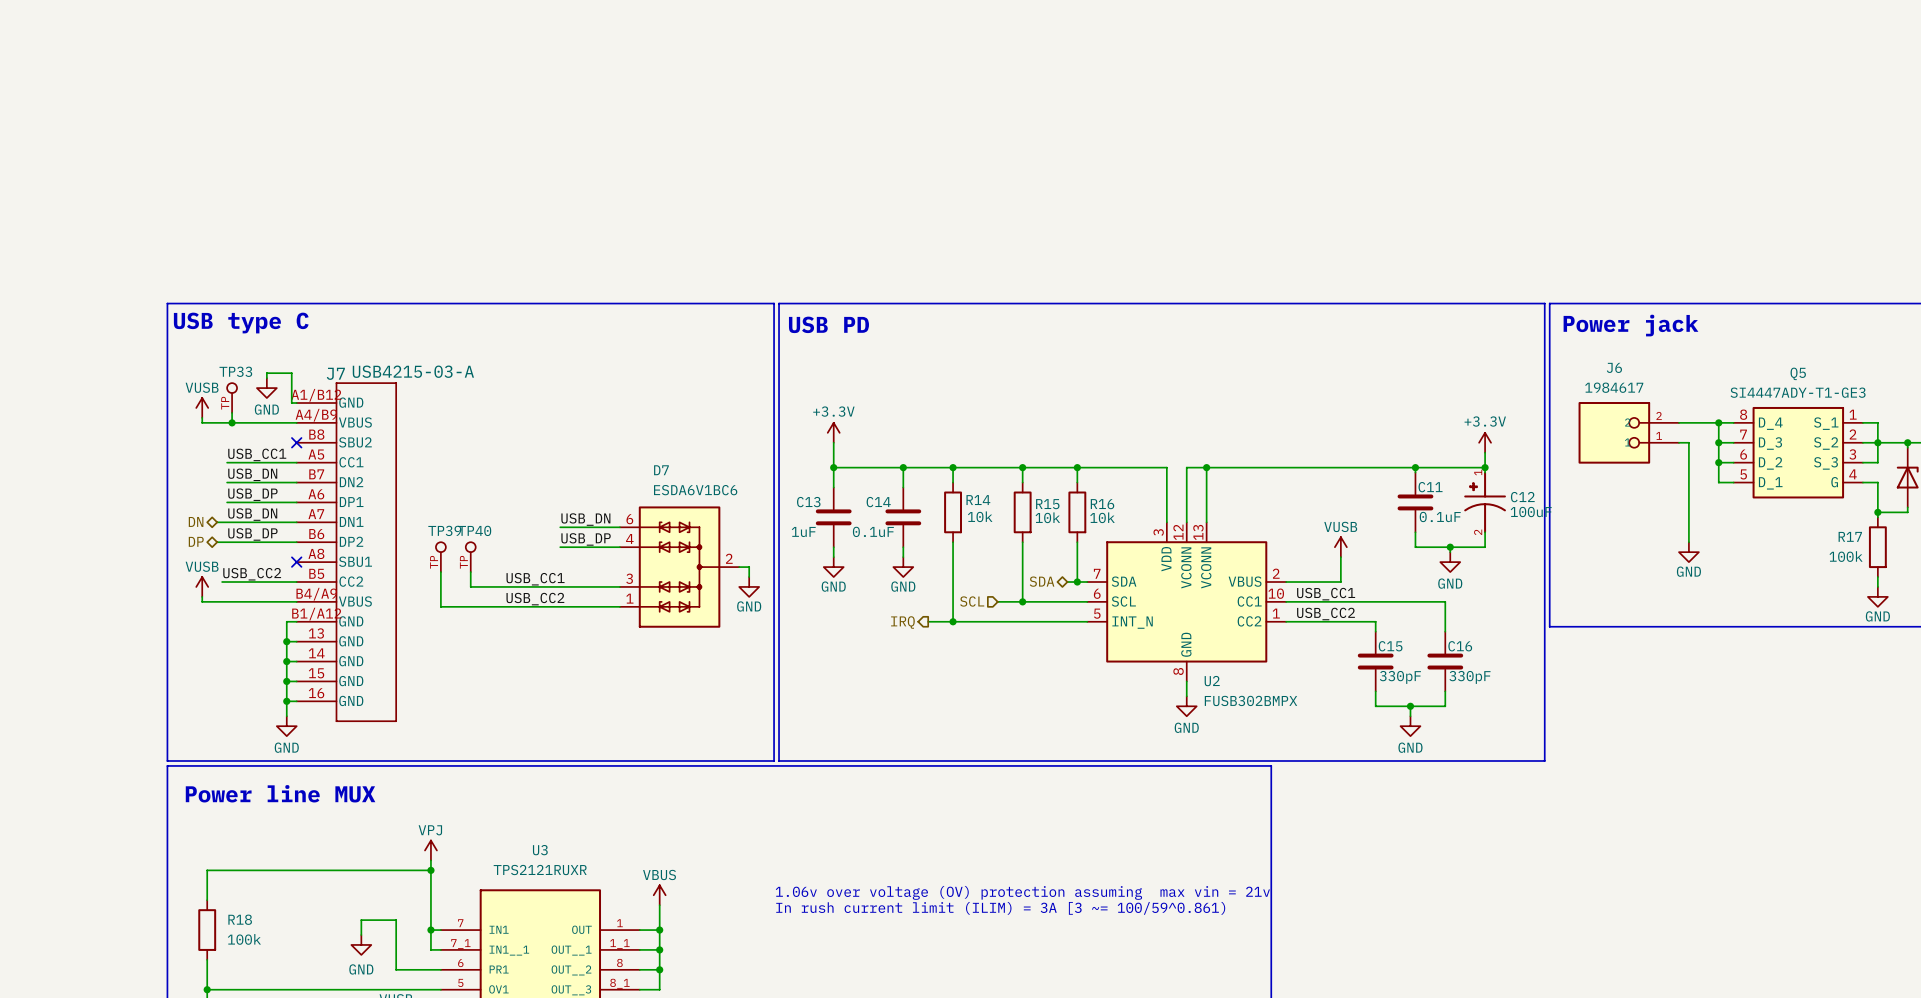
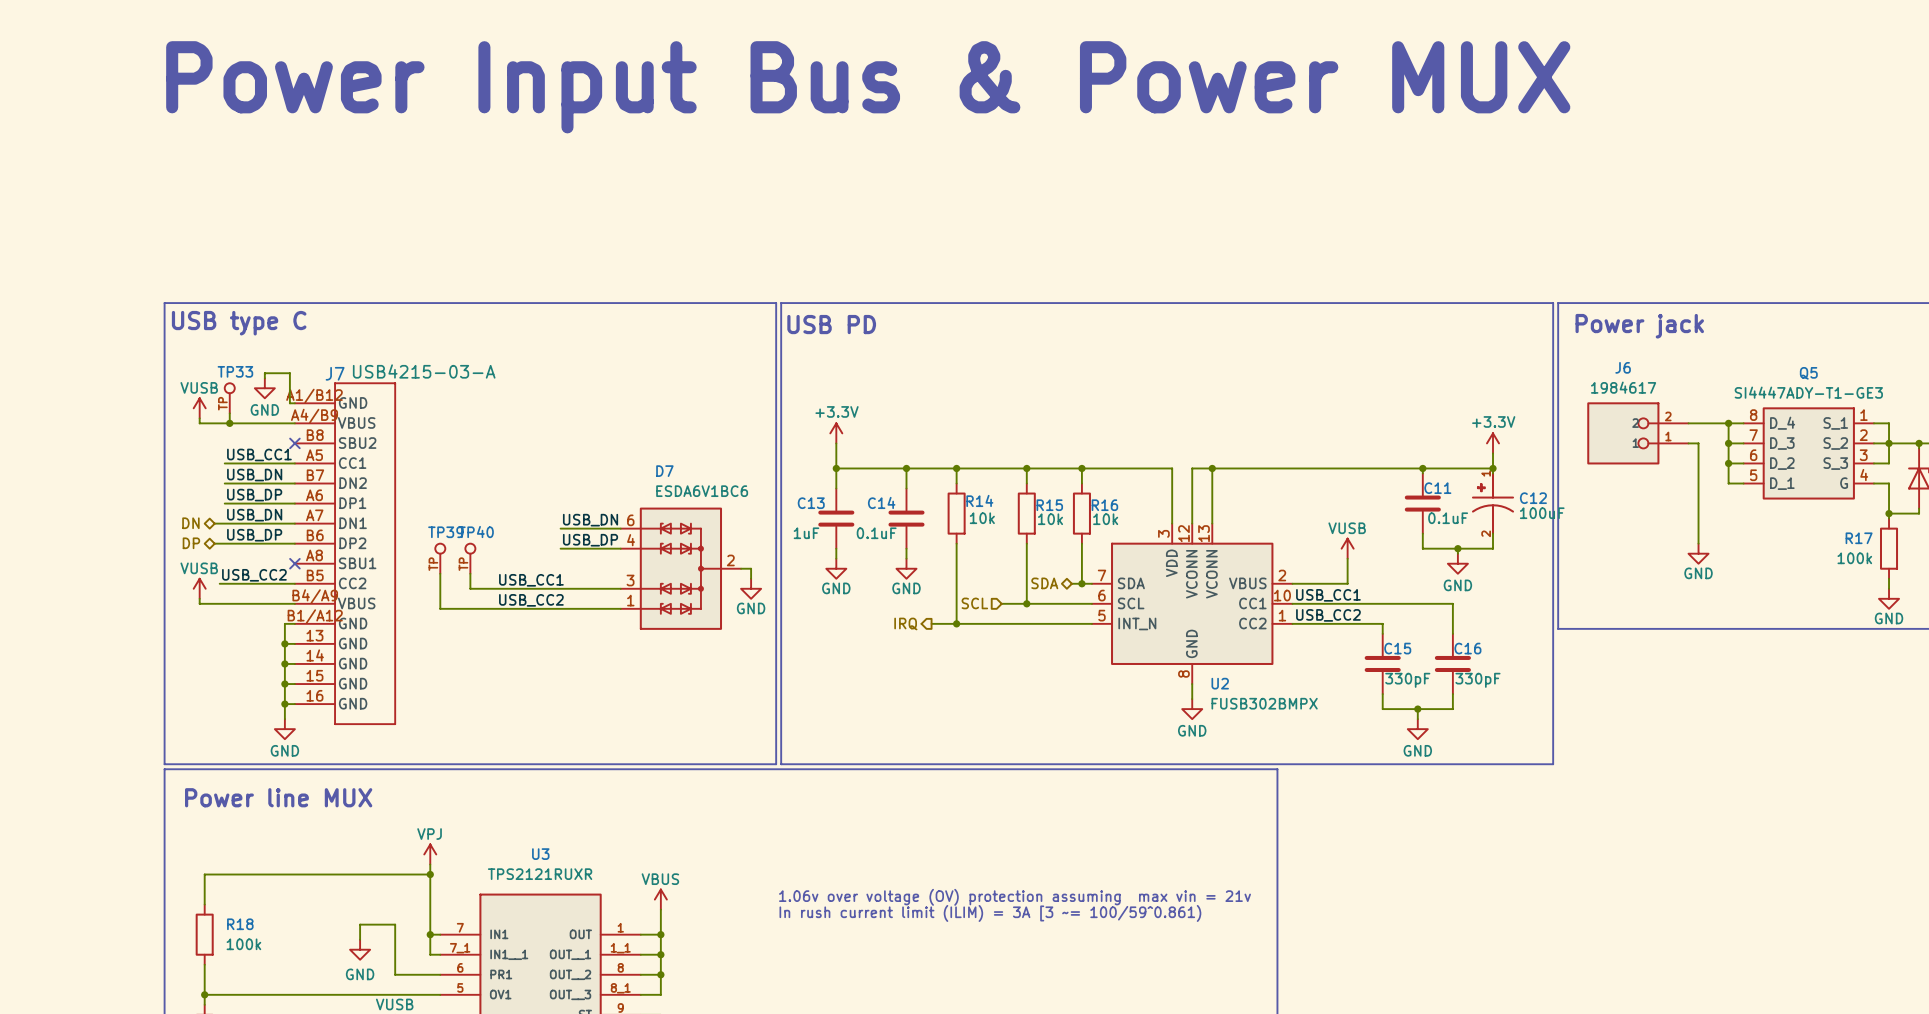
text: none -> Power Input Bus & Power MUX (868, 87)

